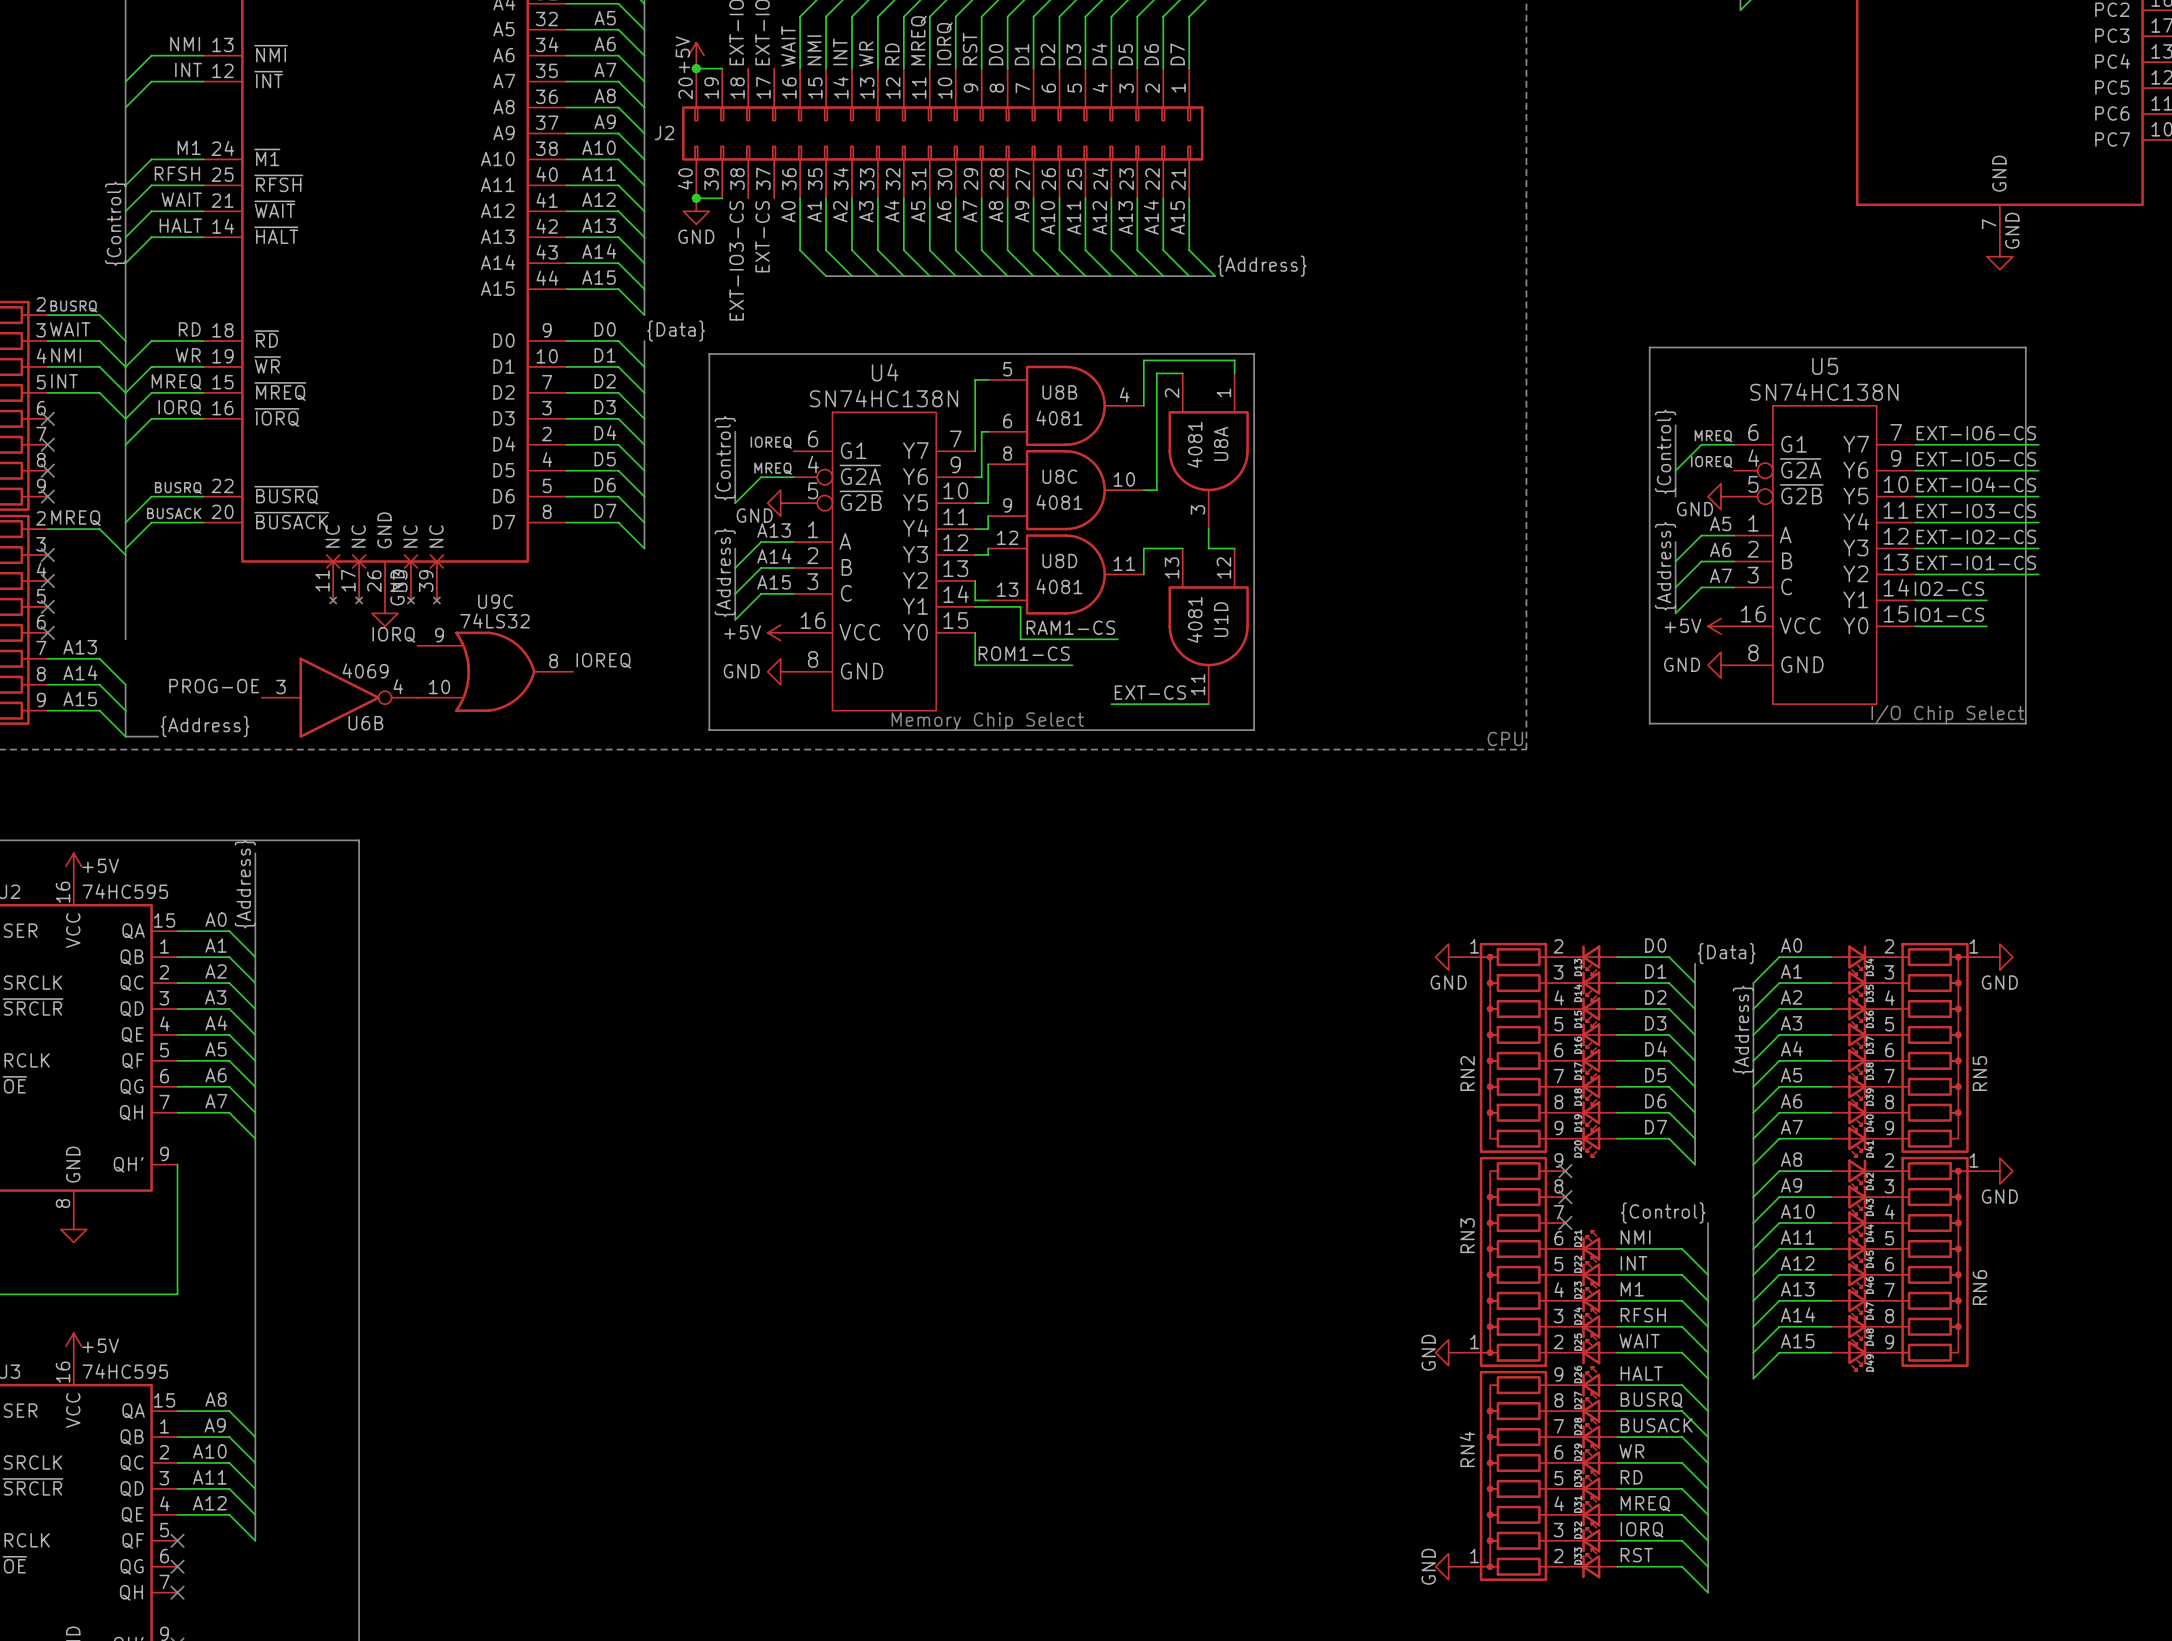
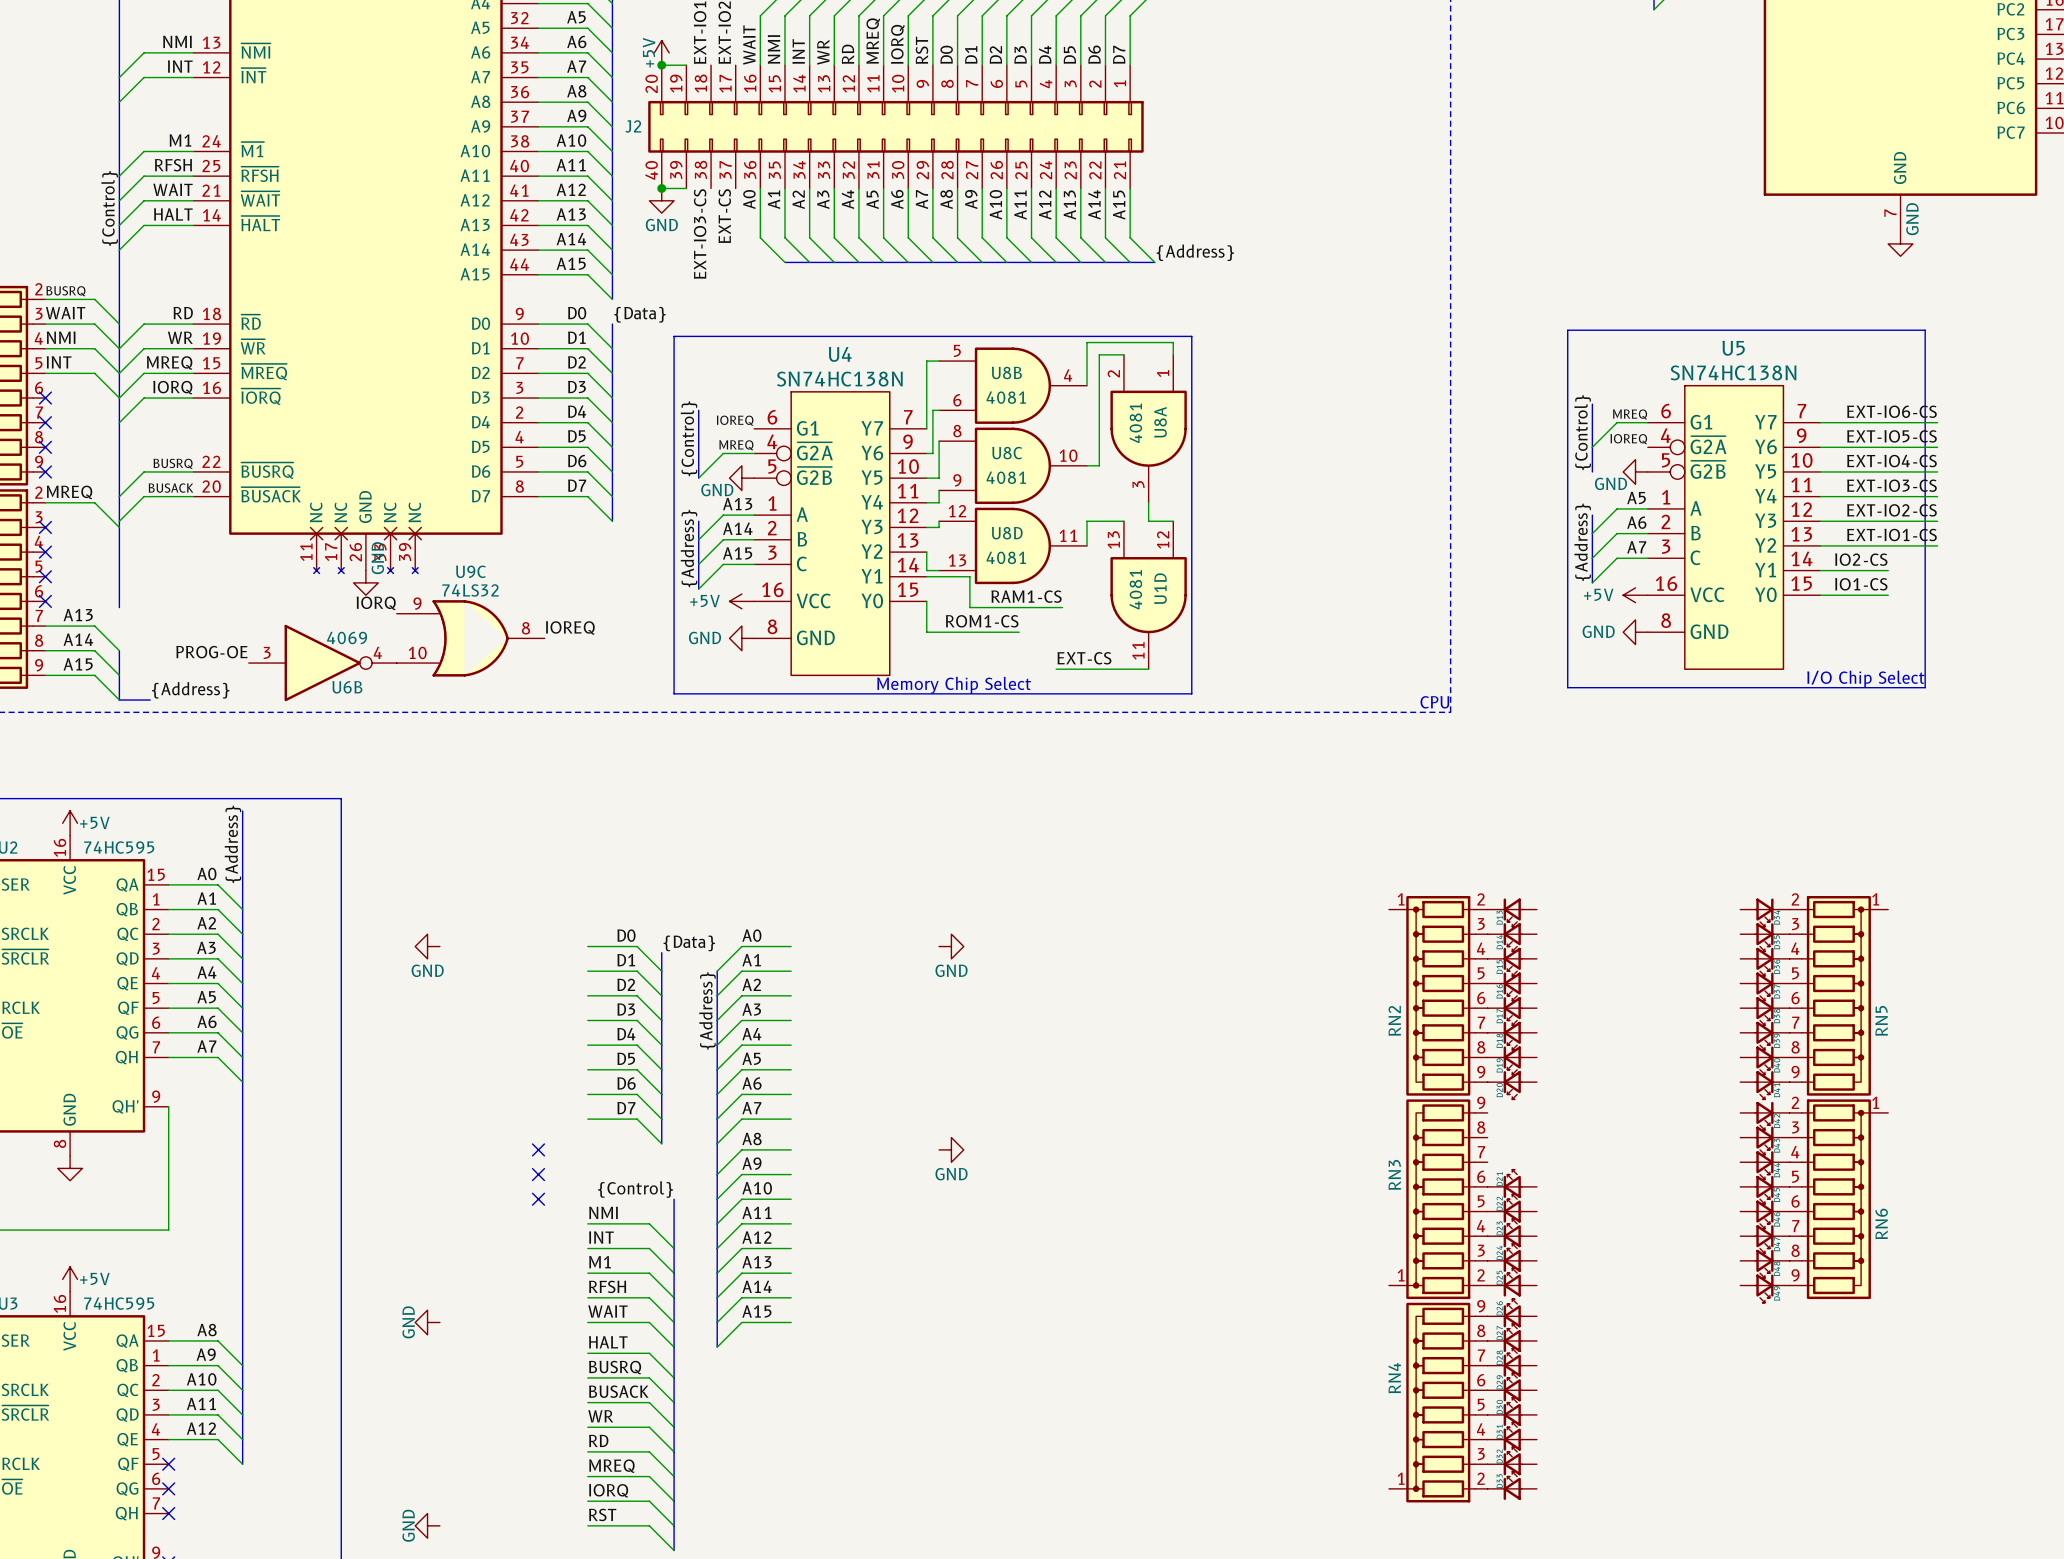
label: D0 (1655, 945) -> none
label: A0 (1791, 945) -> none
label: {Data} (1726, 953) -> none
power symbol: GND (1448, 957) -> none
wire: (1617, 957) (1669, 957) (1695, 983) -> none
wire: (1779, 957) (1753, 983) -> none
wire: (1779, 957) (1831, 957) -> none
power symbol: GND (1999, 957) -> none
bus: (1695, 963) (1695, 1164) -> none
label: D1 (1655, 971) -> none
label: A1 (1791, 971) -> none
wire: (1617, 983) (1669, 983) (1695, 1008) -> none
bus: (1753, 983) (1753, 1378) -> none
wire: (1779, 983) (1753, 1008) -> none
wire: (1779, 983) (1831, 983) -> none
label: none -> D0 (626, 935)
label: none -> A0 (751, 935)
label: none -> {Data} (689, 943)
power symbol: none -> GND (427, 946)
wire: none -> (587, 946) (637, 946) (661, 971)
wire: none -> (791, 946) (741, 946) (717, 971)
power symbol: none -> GND (951, 946)
label: D2 (1655, 997) -> none
label: A2 (1791, 997) -> none
bus: none -> (661, 952) (661, 1143)
wire: (1617, 1008) (1669, 1008) (1695, 1034) -> none
wire: (1779, 1008) (1753, 1034) -> none
wire: (1779, 1008) (1831, 1008) -> none
label: none -> D1 (626, 960)
label: none -> A1 (751, 960)
wire: none -> (587, 971) (637, 971) (661, 995)
bus: none -> (717, 971) (717, 1347)
wire: none -> (791, 971) (741, 971) (717, 995)
label: D3 (1655, 1023) -> none
label: A3 (1791, 1023) -> none
label: {Address} (1743, 1030) -> none
wire: (1617, 1034) (1669, 1034) (1695, 1060) -> none
wire: (1779, 1034) (1753, 1060) -> none
wire: (1779, 1034) (1831, 1034) -> none
label: none -> D2 (626, 984)
label: none -> A2 (751, 984)
wire: none -> (587, 995) (637, 995) (661, 1020)
wire: none -> (791, 995) (741, 995) (717, 1020)
label: D4 (1656, 1048) -> none
label: A4 (1791, 1048) -> none
wire: (1617, 1060) (1669, 1060) (1695, 1086) -> none
wire: (1779, 1060) (1753, 1086) -> none
wire: (1779, 1060) (1831, 1060) -> none
label: none -> D3 (626, 1009)
label: none -> A3 (751, 1009)
label: none -> {Address} (707, 1010)
wire: none -> (587, 1020) (637, 1020) (661, 1045)
wire: none -> (791, 1020) (741, 1020) (717, 1045)
label: D5 (1655, 1075) -> none
label: A5 (1791, 1075) -> none
wire: (1617, 1086) (1669, 1086) (1695, 1112) -> none
wire: (1779, 1086) (1753, 1112) -> none
wire: (1779, 1086) (1831, 1086) -> none
label: none -> D4 (626, 1034)
label: none -> A4 (751, 1034)
wire: none -> (587, 1045) (637, 1045) (661, 1069)
wire: none -> (791, 1045) (741, 1045) (717, 1069)
label: D6 (1655, 1101) -> none
label: A6 (1791, 1101) -> none
wire: (1617, 1112) (1669, 1112) (1695, 1138) -> none
wire: (1779, 1112) (1753, 1138) -> none
wire: (1779, 1112) (1831, 1112) -> none
label: none -> D5 (626, 1058)
label: none -> A5 (751, 1058)
wire: none -> (587, 1069) (637, 1069) (661, 1094)
wire: none -> (791, 1069) (741, 1069) (717, 1094)
label: D7 (1656, 1127) -> none
label: A7 (1791, 1127) -> none
wire: (1617, 1138) (1669, 1138) (1695, 1164) -> none
wire: (1779, 1138) (1753, 1164) -> none
wire: (1779, 1138) (1831, 1138) -> none
label: none -> D6 (626, 1083)
label: none -> A6 (751, 1083)
wire: none -> (587, 1094) (637, 1094) (661, 1119)
wire: none -> (791, 1094) (741, 1094) (717, 1119)
label: A8 (1791, 1159) -> none
label: none -> D7 (626, 1108)
label: none -> A7 (751, 1108)
no-connect mark: (1565, 1171) -> none
wire: (1779, 1171) (1831, 1171) -> none
wire: (1779, 1171) (1753, 1197) -> none
power symbol: GND (1999, 1171) -> none
wire: none -> (587, 1119) (637, 1119) (661, 1143)
wire: none -> (791, 1119) (741, 1119) (717, 1143)
label: A9 (1791, 1185) -> none
no-connect mark: (1565, 1197) -> none
wire: (1779, 1197) (1753, 1223) -> none
wire: (1779, 1197) (1831, 1197) -> none
label: none -> A8 (751, 1138)
no-connect mark: none -> (538, 1149)
wire: none -> (741, 1149) (791, 1149)
wire: none -> (741, 1149) (717, 1174)
power symbol: none -> GND (951, 1149)
label: A10 (1797, 1211) -> none
label: {Control} (1663, 1212) -> none
no-connect mark: (1565, 1223) -> none
bus: (1708, 1223) (1708, 1592) -> none
wire: (1779, 1223) (1753, 1248) -> none
wire: (1779, 1223) (1831, 1223) -> none
label: none -> A9 (751, 1163)
no-connect mark: none -> (538, 1174)
wire: none -> (791, 1174) (741, 1174) (717, 1199)
label: NMI (1635, 1237) -> none
label: A11 (1797, 1237) -> none
wire: (1617, 1248) (1682, 1248) (1708, 1274) -> none
wire: (1779, 1248) (1831, 1248) -> none
wire: (1779, 1248) (1753, 1274) -> none
label: none -> A10 (757, 1188)
label: none -> {Control} (635, 1189)
no-connect mark: none -> (538, 1199)
bus: none -> (674, 1199) (674, 1550)
wire: none -> (791, 1199) (741, 1199) (717, 1223)
label: INT (1634, 1263) -> none
label: A12 (1797, 1263) -> none
wire: (1617, 1274) (1682, 1274) (1708, 1300) -> none
wire: (1779, 1274) (1753, 1300) -> none
wire: (1779, 1274) (1831, 1274) -> none
label: none -> NMI (603, 1212)
label: none -> A11 (756, 1212)
wire: none -> (587, 1223) (649, 1223) (674, 1248)
wire: none -> (791, 1223) (741, 1223) (717, 1248)
label: M1 (1632, 1289) -> none
label: A13 (1797, 1289) -> none
wire: (1617, 1300) (1682, 1300) (1708, 1326) -> none
wire: (1779, 1300) (1753, 1326) -> none
wire: (1779, 1300) (1831, 1300) -> none
label: none -> INT (601, 1237)
label: none -> A12 (756, 1237)
wire: none -> (587, 1248) (649, 1248) (674, 1273)
wire: none -> (741, 1248) (791, 1248)
wire: none -> (741, 1248) (717, 1273)
label: A14 (1798, 1314) -> none
label: RFSH (1643, 1315) -> none
wire: (1617, 1326) (1682, 1326) (1708, 1352) -> none
wire: (1779, 1326) (1753, 1352) -> none
wire: (1779, 1326) (1831, 1326) -> none
label: none -> M1 (600, 1262)
label: none -> A13 (756, 1262)
wire: none -> (587, 1273) (649, 1273) (674, 1297)
wire: none -> (791, 1273) (741, 1273) (717, 1297)
label: WAIT (1639, 1341) -> none
label: A15 (1797, 1341) -> none
power symbol: GND (1448, 1352) -> none
wire: (1617, 1352) (1682, 1352) -> none
wire: (1682, 1352) (1708, 1378) -> none
wire: (1779, 1352) (1831, 1352) -> none
wire: (1779, 1352) (1753, 1378) -> none
label: none -> A14 (757, 1286)
label: none -> RFSH (607, 1286)
wire: none -> (587, 1297) (649, 1297) (674, 1322)
wire: none -> (791, 1297) (741, 1297) (717, 1322)
label: HALT (1641, 1373) -> none
label: none -> WAIT (607, 1311)
label: none -> A15 (756, 1311)
wire: (1617, 1385) (1682, 1385) (1708, 1411) -> none
power symbol: none -> GND (427, 1322)
wire: none -> (587, 1322) (649, 1322)
wire: none -> (649, 1322) (674, 1347)
wire: none -> (741, 1322) (791, 1322)
wire: none -> (741, 1322) (717, 1347)
label: BUSRQ (1651, 1400) -> none
wire: (1617, 1411) (1682, 1411) (1708, 1437) -> none
label: none -> HALT (608, 1342)
wire: none -> (587, 1353) (649, 1353) (674, 1377)
label: BUSACK (1656, 1425) -> none
wire: (1617, 1437) (1682, 1437) (1708, 1462) -> none
label: none -> BUSRQ (615, 1367)
wire: none -> (587, 1377) (649, 1377) (674, 1402)
label: WR (1631, 1451) -> none
wire: (1617, 1462) (1682, 1462) (1708, 1488) -> none
label: none -> BUSACK (618, 1391)
wire: none -> (587, 1402) (649, 1402) (674, 1427)
label: RD (1631, 1477) -> none
wire: (1617, 1488) (1682, 1488) (1708, 1514) -> none
label: none -> WR (600, 1416)
wire: none -> (587, 1427) (649, 1427) (674, 1451)
label: MREQ (1645, 1503) -> none
wire: (1617, 1514) (1682, 1514) (1708, 1540) -> none
label: none -> RD (598, 1440)
wire: none -> (587, 1451) (649, 1451) (674, 1476)
label: IORQ (1642, 1529) -> none
wire: (1617, 1540) (1682, 1540) (1708, 1566) -> none
label: none -> MREQ (611, 1466)
wire: none -> (587, 1476) (649, 1476) (674, 1501)
label: RST (1636, 1555) -> none
power symbol: GND (1448, 1566) -> none
wire: (1617, 1566) (1682, 1566) (1708, 1592) -> none
label: none -> IORQ (608, 1490)
wire: none -> (587, 1501) (649, 1501) (674, 1525)
label: none -> RST (602, 1514)
power symbol: none -> GND (427, 1525)
wire: none -> (587, 1525) (649, 1525) (674, 1550)

